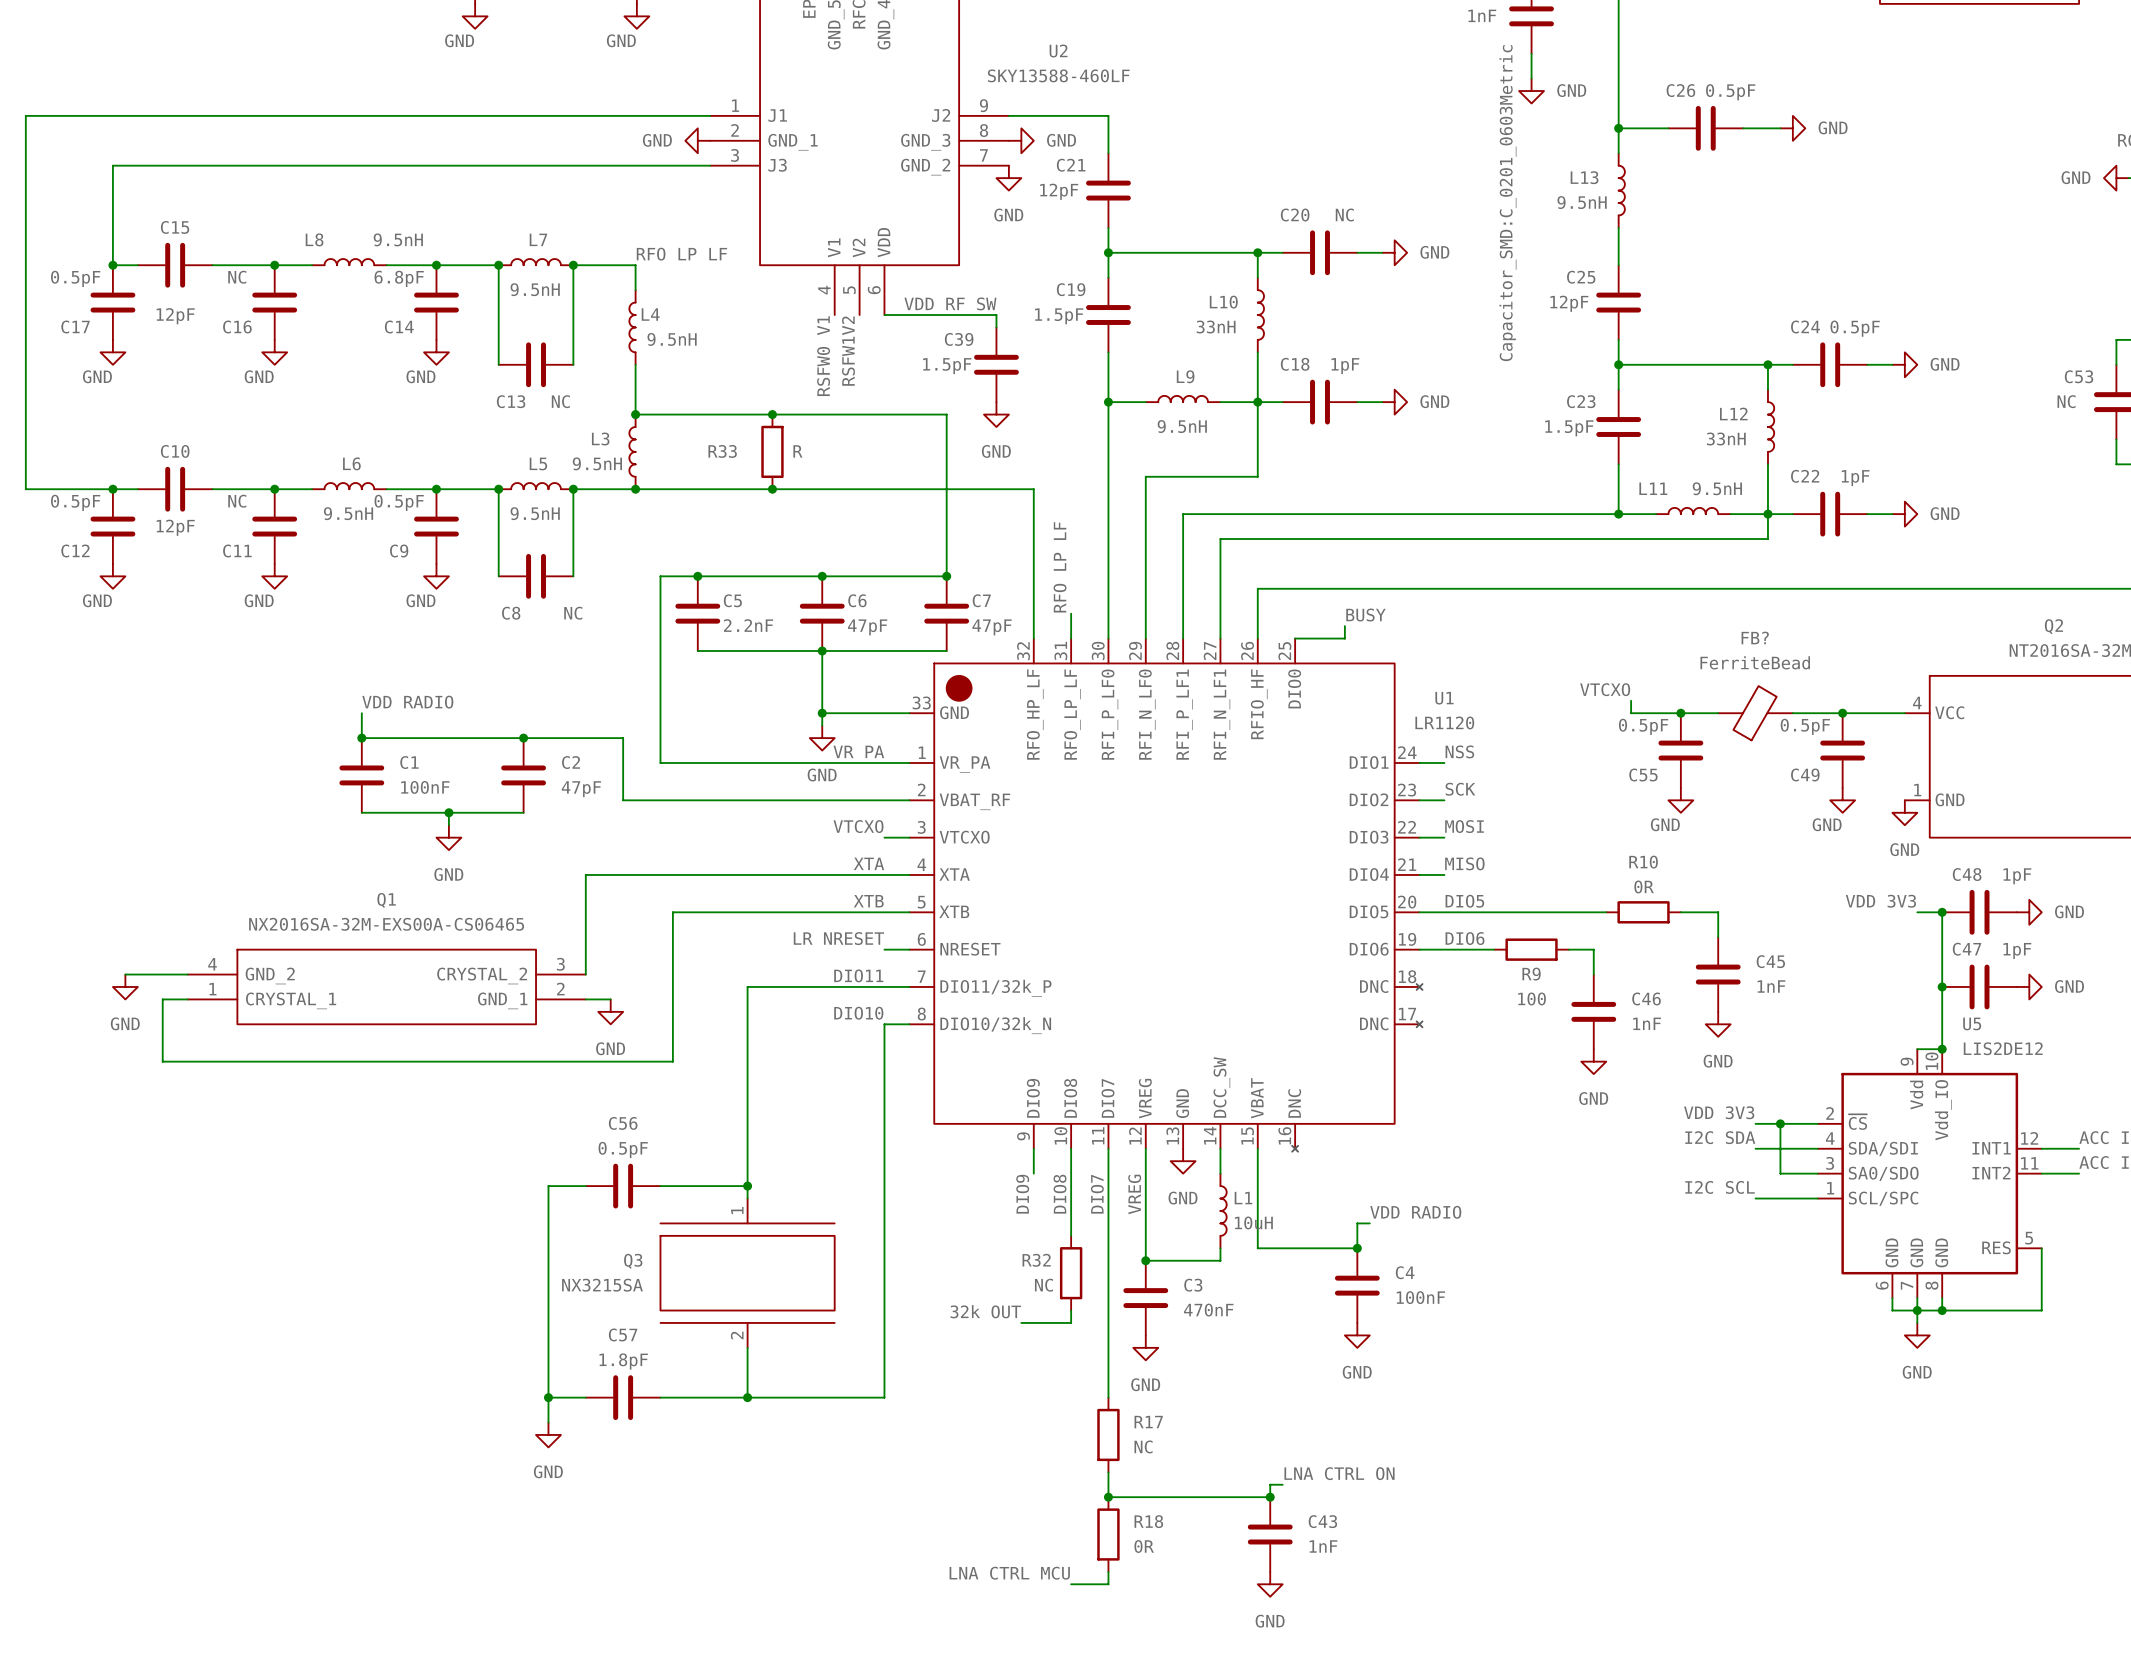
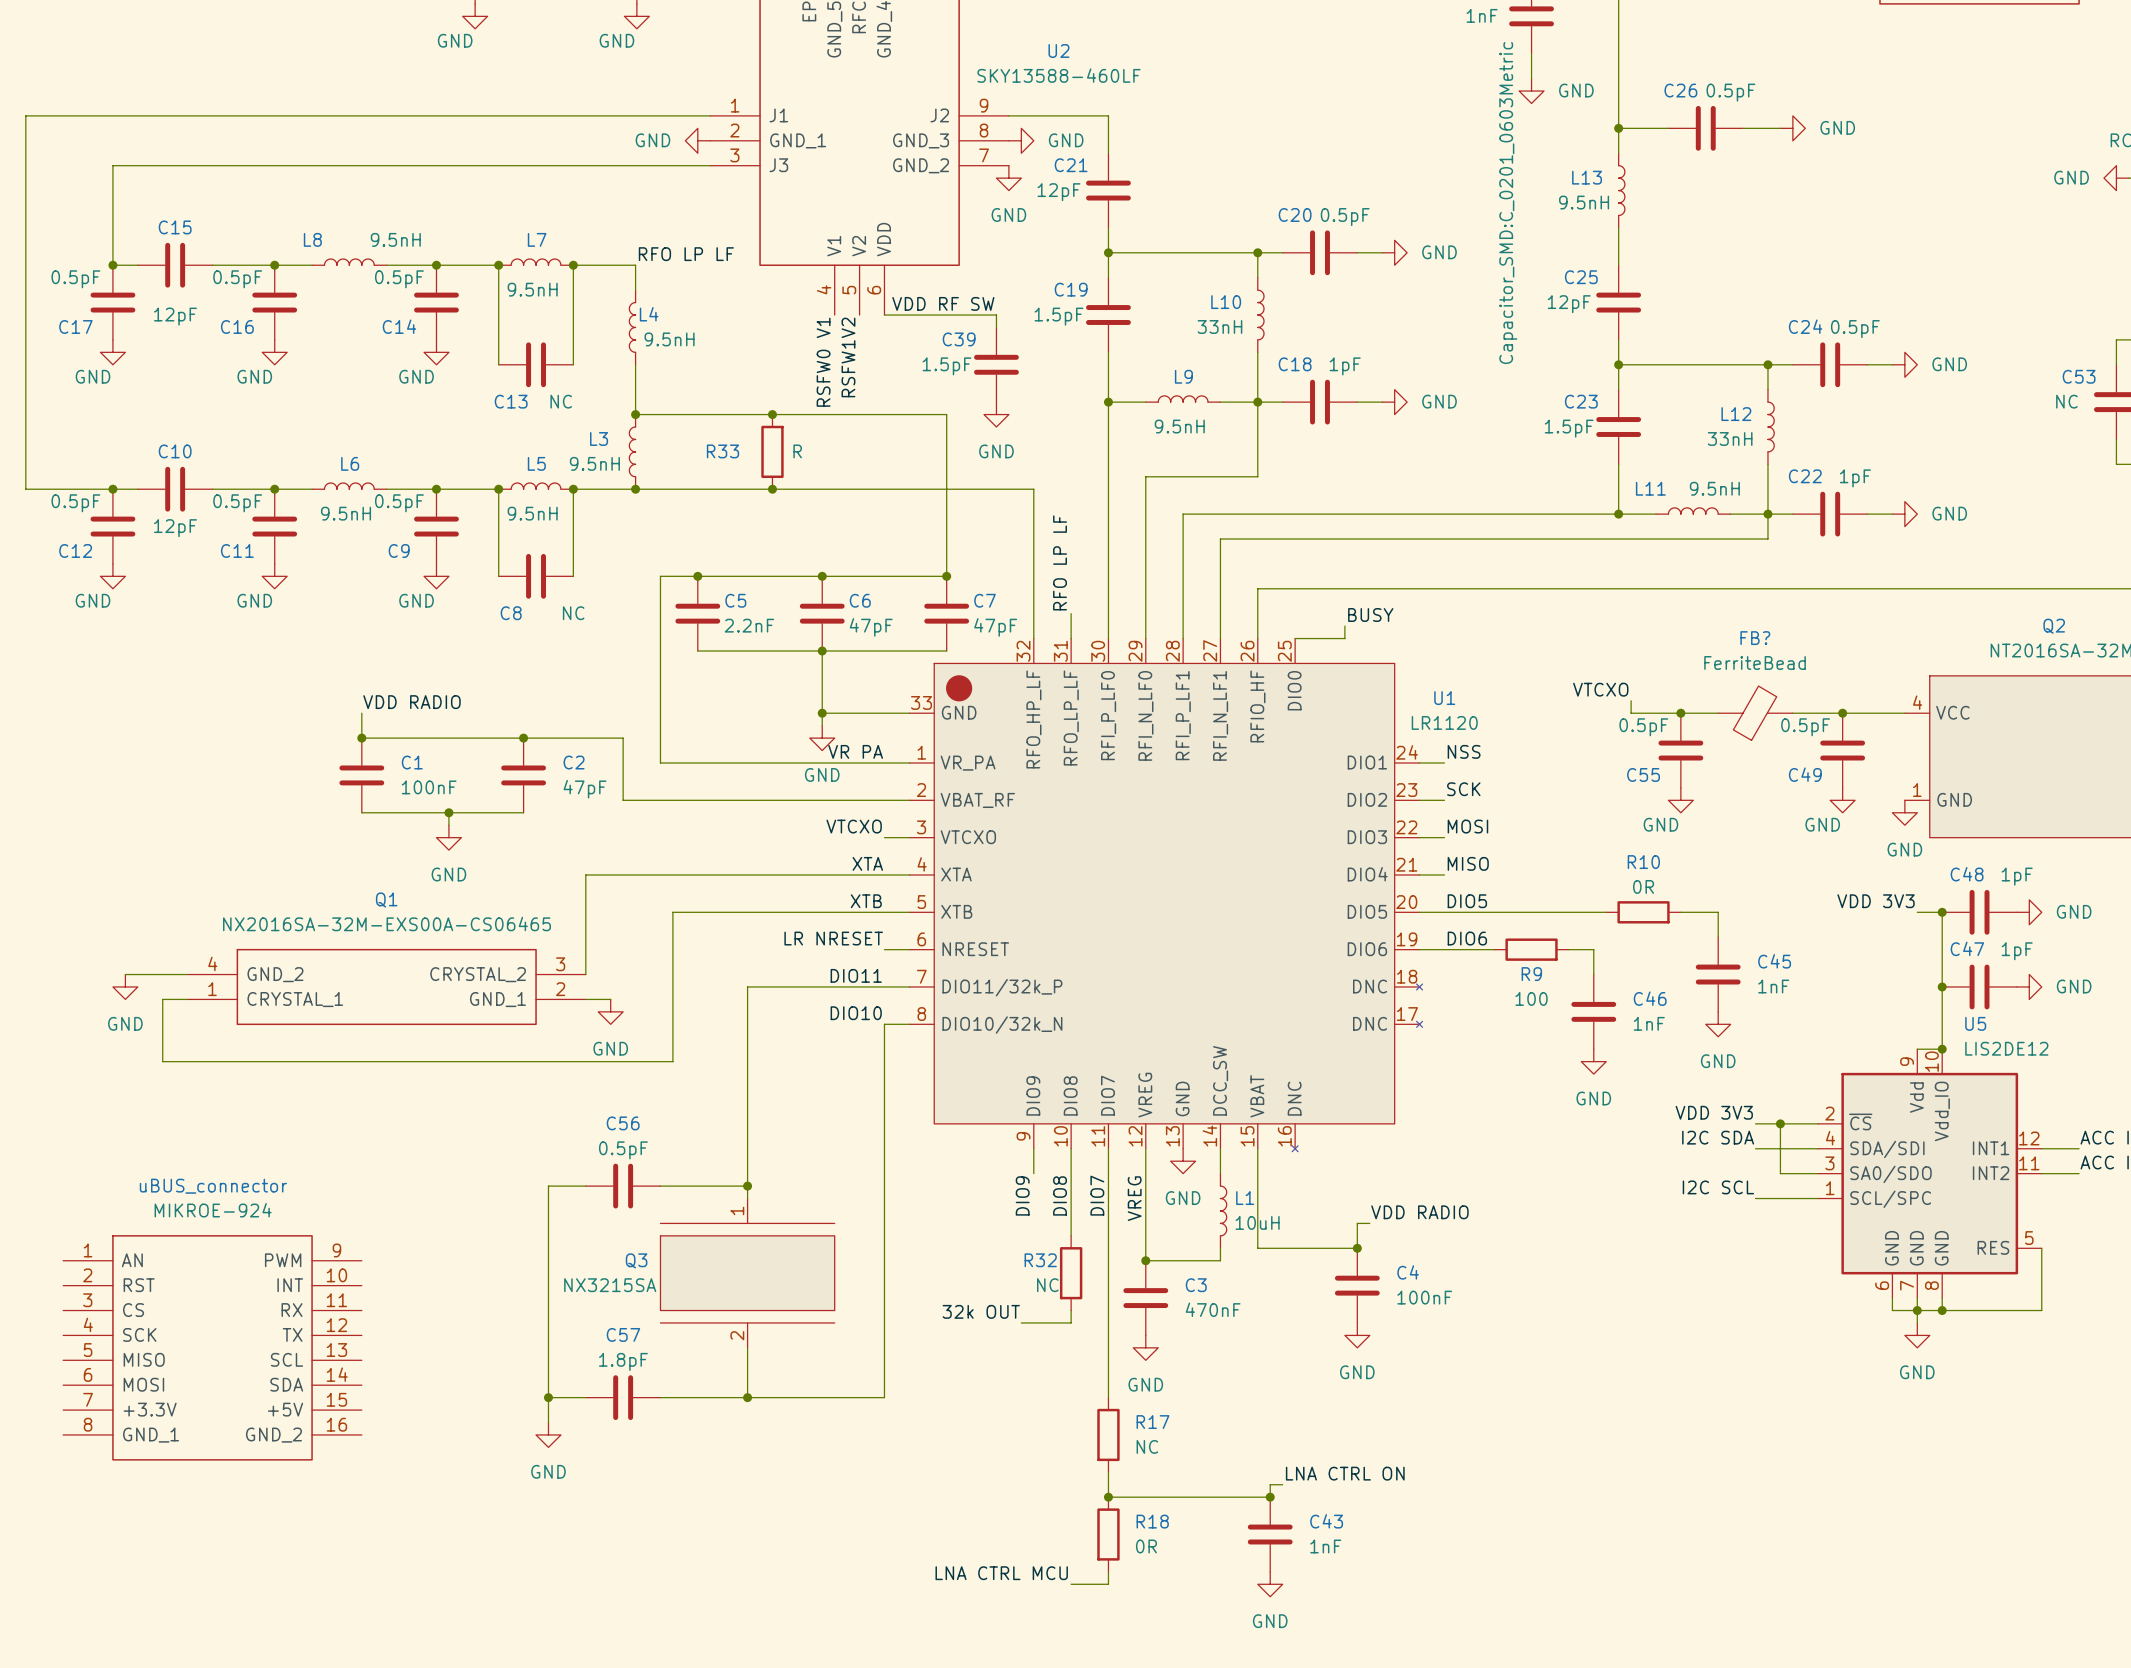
C20 value: NC (1344, 215) -> 0.5pF (1345, 217)
C16 value: NC (237, 277) -> 0.5pF (237, 279)
C14 value: 6.8pF (399, 278) -> 0.5pF (399, 279)
C11 value: NC (237, 501) -> 0.5pF (237, 503)
uBUS_connector: none -> MIKROE-924 (212, 1347)

